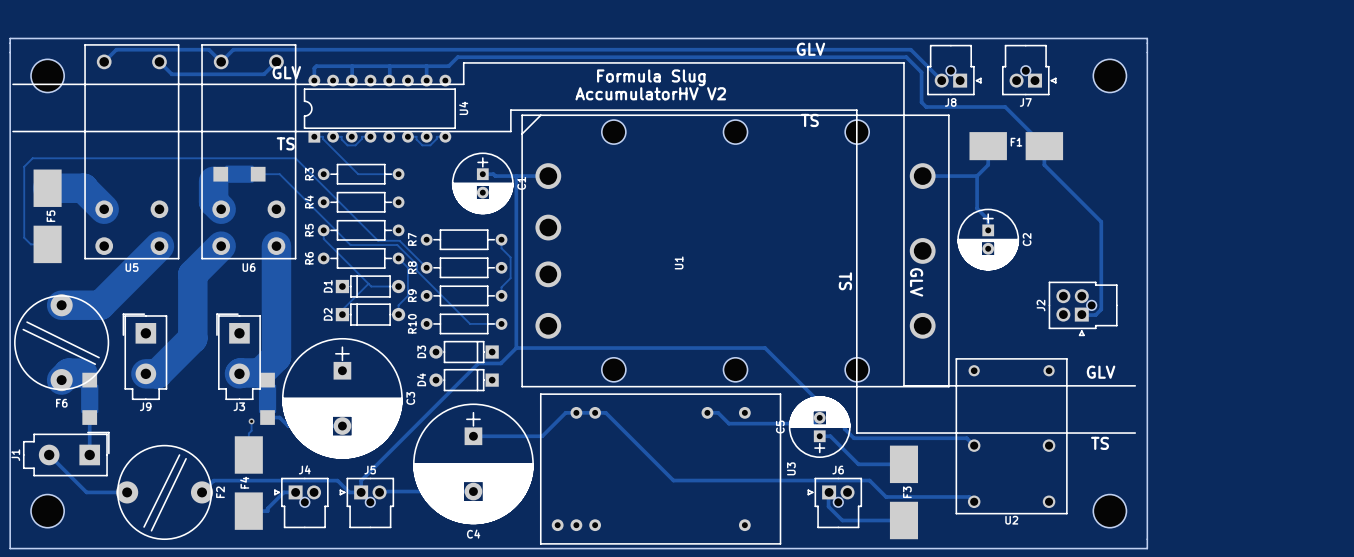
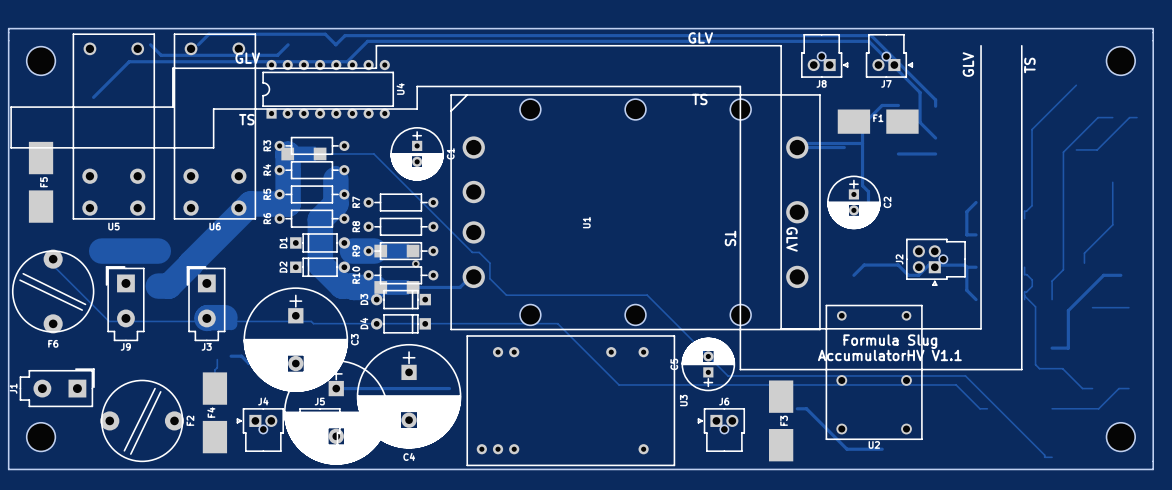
board edge: (1147, 38) (1147, 548) -> (991, 28) (1153, 28) (1153, 469) (991, 469)
track: none -> (150, 44) (161, 55) (277, 55) (288, 44)
track: none -> (198, 44) (208, 34) (325, 34) (335, 44) (345, 35) (871, 35) (935, 99) (935, 106)
line: none -> (981, 45) (981, 328)
line: none -> (1021, 45) (1021, 369) (981, 369)
track: (104, 61) (116, 49) (209, 49) (221, 61) (233, 49) (910, 49) (941, 80) -> none
track: (159, 61) (171, 74) (264, 74) (276, 61) -> none
line: (903, 62) (463, 62) (463, 84) (435, 84) -> (781, 49) (781, 45) (376, 45) (376, 68)
track: (352, 66) (351, 80) -> none
track: (389, 66) (389, 80) -> none
track: (426, 66) (426, 80) -> none
part: (1109, 75) -> none
part: none -> (1120, 60)
text: Formula Slug (651, 77) -> none
track: (314, 80) (314, 68) (316, 66) (448, 66) (457, 57) (906, 57) (921, 72) (921, 102) (926, 107) (1005, 107) (1044, 146) (1044, 164) (1101, 221) (1101, 309) (1095, 315) (1081, 314) -> none
text: none -> GLV (968, 64)
text: none -> TS (1029, 65)
line: (12, 84) (200, 84) -> none
text: AccumulatorHV V2 (650, 93) -> none
track: none -> (1076, 85) (1032, 129) (1032, 205) (1024, 211) (1024, 218)
line: (856, 110) (510, 110) (510, 131) (482, 131) -> (740, 90) (740, 86) (417, 86) (417, 109)
track: none -> (93, 97) (129, 61) (347, 61) (367, 41) (868, 41) (920, 92) (920, 122) (935, 138)
track: none -> (898, 105) (882, 105) (862, 125) (862, 185) (868, 191) (868, 200)
line: (12, 131) (247, 131) -> (172, 68) (172, 107) (11, 107) (11, 147) (213, 147) (213, 109)
track: (314, 136) (322, 136) (358, 174) (398, 174) -> none
track: (333, 136) (341, 136) (341, 139) (347, 145) (355, 145) (361, 136) (370, 136) -> none
track: (407, 136) (416, 136) (416, 139) (422, 145) (430, 145) (436, 136) (445, 136) -> none
track: none -> (1112, 117) (1098, 117) (1063, 152) (1063, 269) (1052, 281) (1052, 299)
track: none -> (1137, 117) (1129, 117) (1097, 149) (1076, 149)
track: (988, 146) (988, 164) (977, 176) (977, 208) (988, 219) (988, 230) -> none
track: none -> (798, 143) (862, 143)
track: (220, 174) (213, 181) (213, 201) (221, 209) -> none
part position: (239, 174) -> (303, 153)
track: (258, 174) (279, 174) (350, 245) (397, 245) (417, 264) (417, 270) (470, 323) (501, 323) -> none
track: (482, 174) (493, 174) (495, 176) (548, 176) -> none
track: (516, 176) (516, 348) -> none
track: none -> (287, 153) (288, 204) (250, 204) (168, 286) (158, 286)
track: none -> (320, 153) (373, 153) (472, 252) (479, 252) (489, 263) (489, 278) (506, 295) (647, 295) (728, 375) (965, 375) (1044, 455) (1044, 457) (1052, 457)
track: none -> (898, 153) (935, 153)
track: (47, 188) (83, 188) (104, 209) -> none
track: none -> (335, 172) (335, 204) (320, 219) (320, 264) (342, 286) (380, 287)
track: none -> (1112, 182) (1112, 224) (1084, 253) (1084, 263)
track: (323, 230) (323, 238) (371, 286) (398, 286) -> none
track: (501, 239) (501, 248) (510, 257) (510, 278) (501, 287) (501, 295) -> none
track: none -> (976, 202) (966, 211) (966, 234) (976, 234)
track: (47, 244) (30, 244) (24, 237) (24, 166) (32, 158) (295, 158) (378, 240) (399, 240) (426, 267) -> none
track: (159, 246) (100, 305) (61, 305) -> none
track: (221, 246) (192, 274) (192, 338) (157, 373) (145, 373) -> none
track: (276, 246) (276, 356) (260, 372) -> none
track: (398, 258) (407, 267) (407, 295) (398, 305) (398, 314) -> none
track: (368, 283) (342, 309) (342, 314) -> none
track: none -> (53, 251) (53, 265) (109, 321) (557, 323) (619, 384) (956, 384) (979, 408) (987, 408)
track: none -> (101, 251) (158, 251)
track: none -> (352, 251) (380, 251)
part: none -> (396, 251)
via: none -> (415, 263)
track: none -> (966, 267) (976, 267)
track: none -> (966, 267) (966, 290) (976, 299)
track: none -> (966, 267) (964, 265) (928, 265) (918, 275) (908, 275) (898, 265) (864, 265) (853, 275)
track: none -> (1024, 267) (1024, 274) (1032, 280) (1032, 286) (1024, 292) (1024, 299)
track: none -> (474, 272) (460, 287) (413, 287)
track: none -> (1120, 275) (1103, 275) (1068, 310) (1068, 348) (1052, 348)
part: none -> (396, 287)
track: none -> (1024, 295) (1035, 306) (1035, 364) (1039, 368) (1062, 368) (1082, 388) (1092, 388)
track: (516, 348) (765, 348) (853, 438) (966, 438) (974, 445) -> none
track: (516, 348) (500, 363) (478, 363) (361, 480) (361, 492) (349, 492) (337, 480) (213, 480) (202, 492) -> none
track: none -> (1092, 307) (1128, 307)
text: GLV (1101, 372) -> none
track: (61, 380) (68, 373) (82, 373) (89, 380) -> none
part: (89, 398) -> none
part: (267, 398) -> none
text: none -> Formula Slug (890, 341)
track: (707, 412) (718, 412) (728, 423) (813, 423) (819, 417) -> none
text: none -> AccumulatorHV V1.1 (889, 355)
track: (89, 417) (89, 454) -> none
via: (251, 421) -> none
track: (473, 436) (542, 436) (565, 412) (605, 412) (673, 480) (869, 480) (886, 496) (969, 496) (974, 501) -> none
track: (819, 436) (830, 436) (858, 464) (903, 464) -> none
text: TS (1099, 443) -> none
track: (49, 454) (86, 492) (127, 492) -> none
track: none -> (336, 388) (449, 388)
track: none -> (1128, 388) (1118, 388) (1098, 408) (1052, 408)
track: none -> (797, 408) (806, 408) (846, 449) (882, 449)
part: none -> (336, 412)
track: (295, 492) (283, 492) (267, 508) (267, 511) (248, 511) -> none
track: (829, 492) (828, 506) (842, 520) (903, 520) -> none
part: (1109, 511) -> none
part: none -> (1120, 437)

